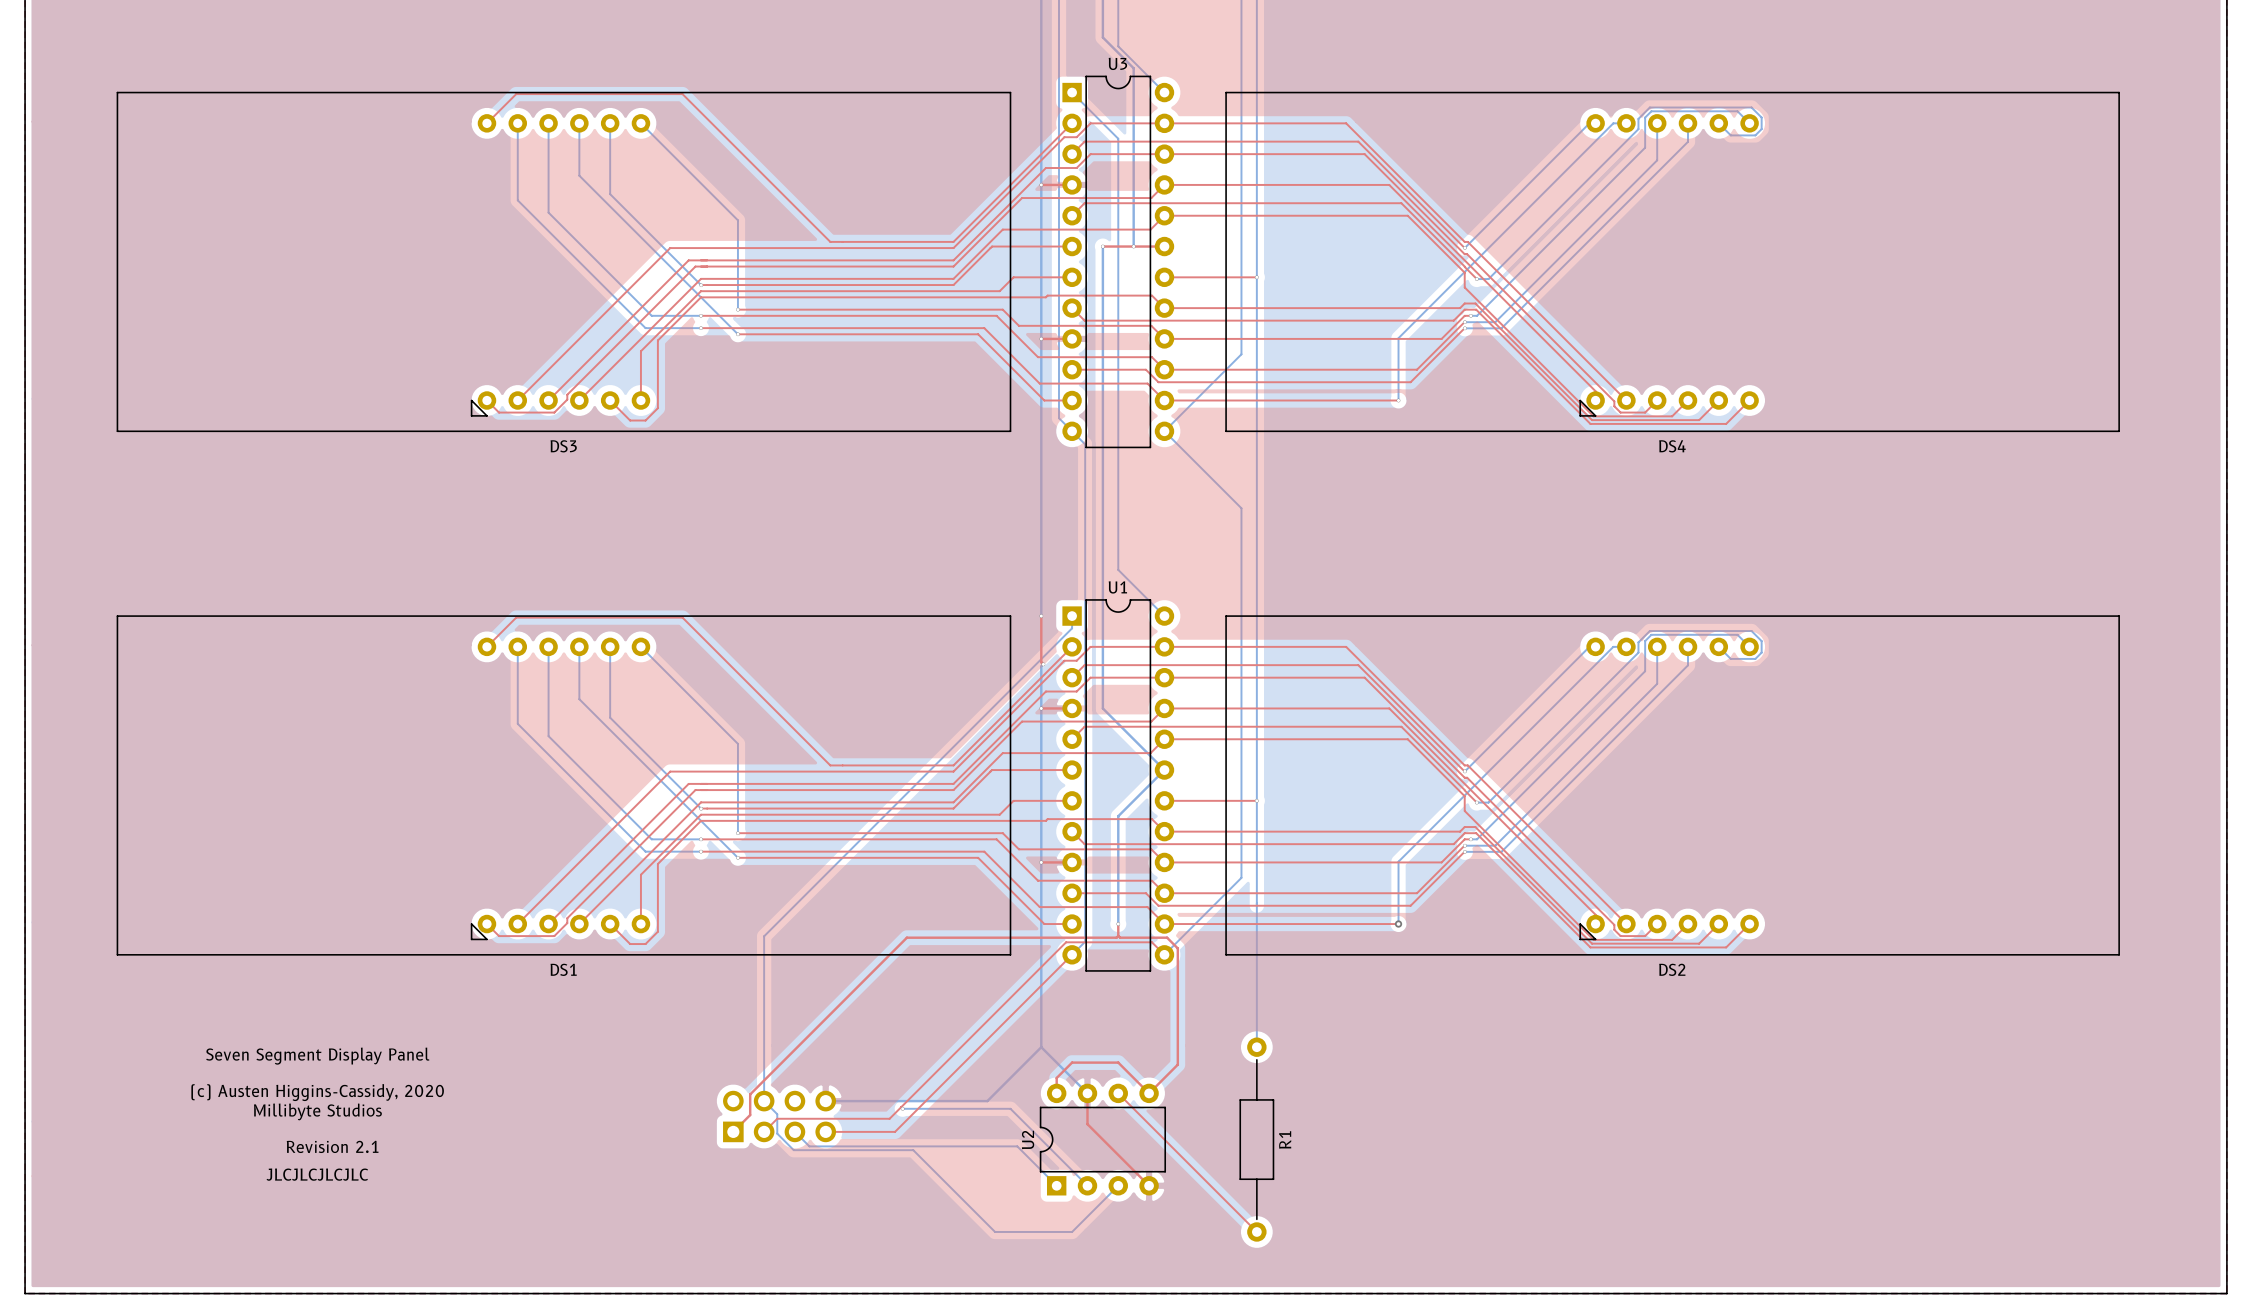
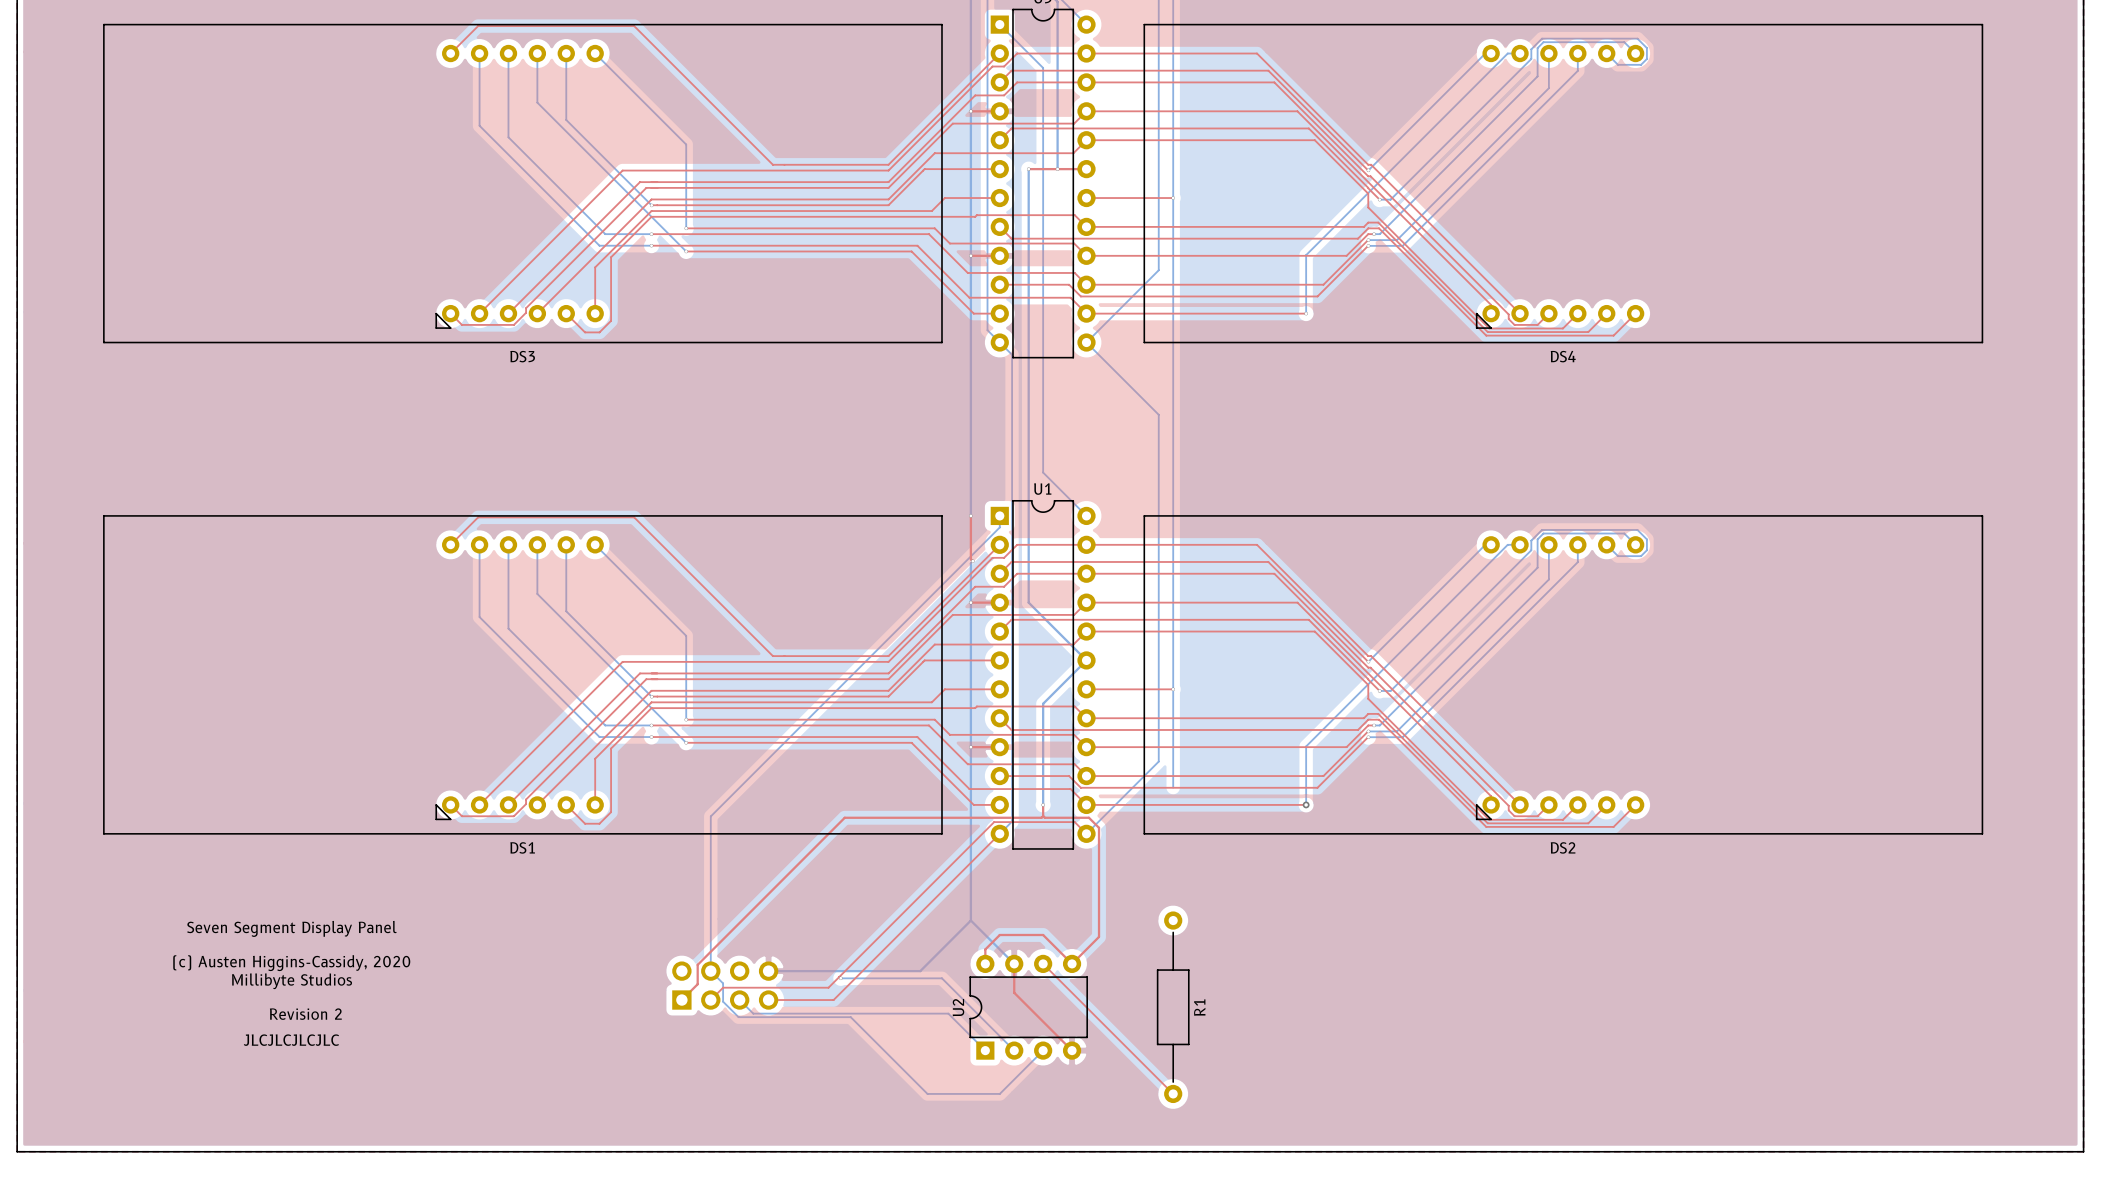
bottom track: (1256, 905) (1256, 1047) -> none
text: Revision 2.1 (332, 1146) -> Revision 2 (305, 1014)

